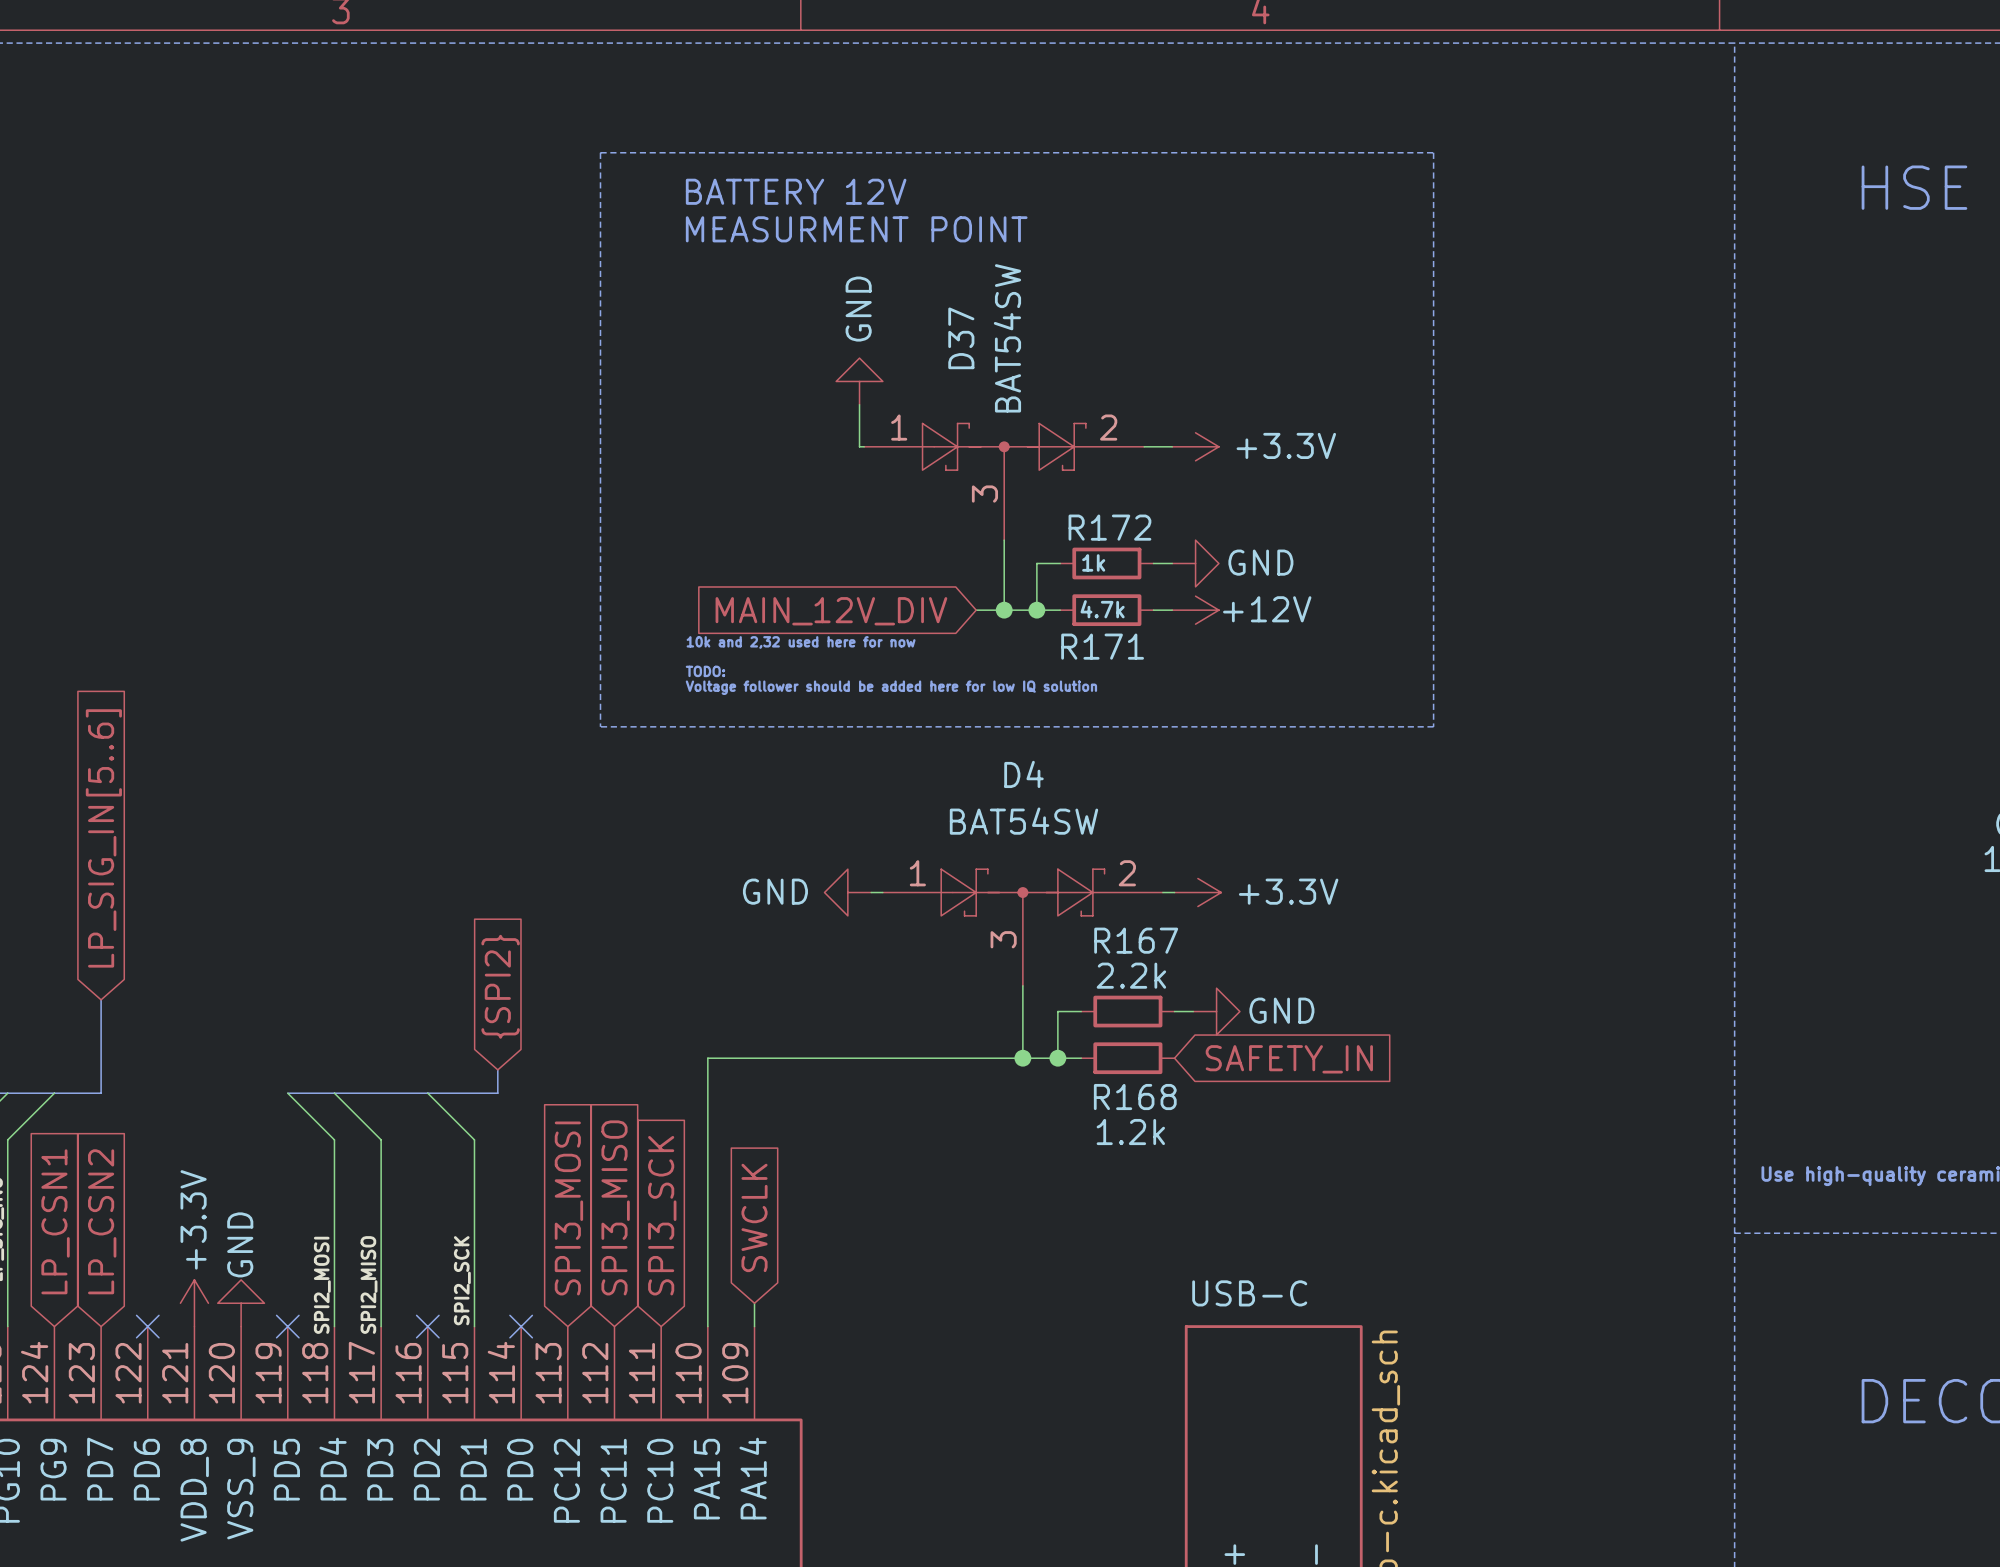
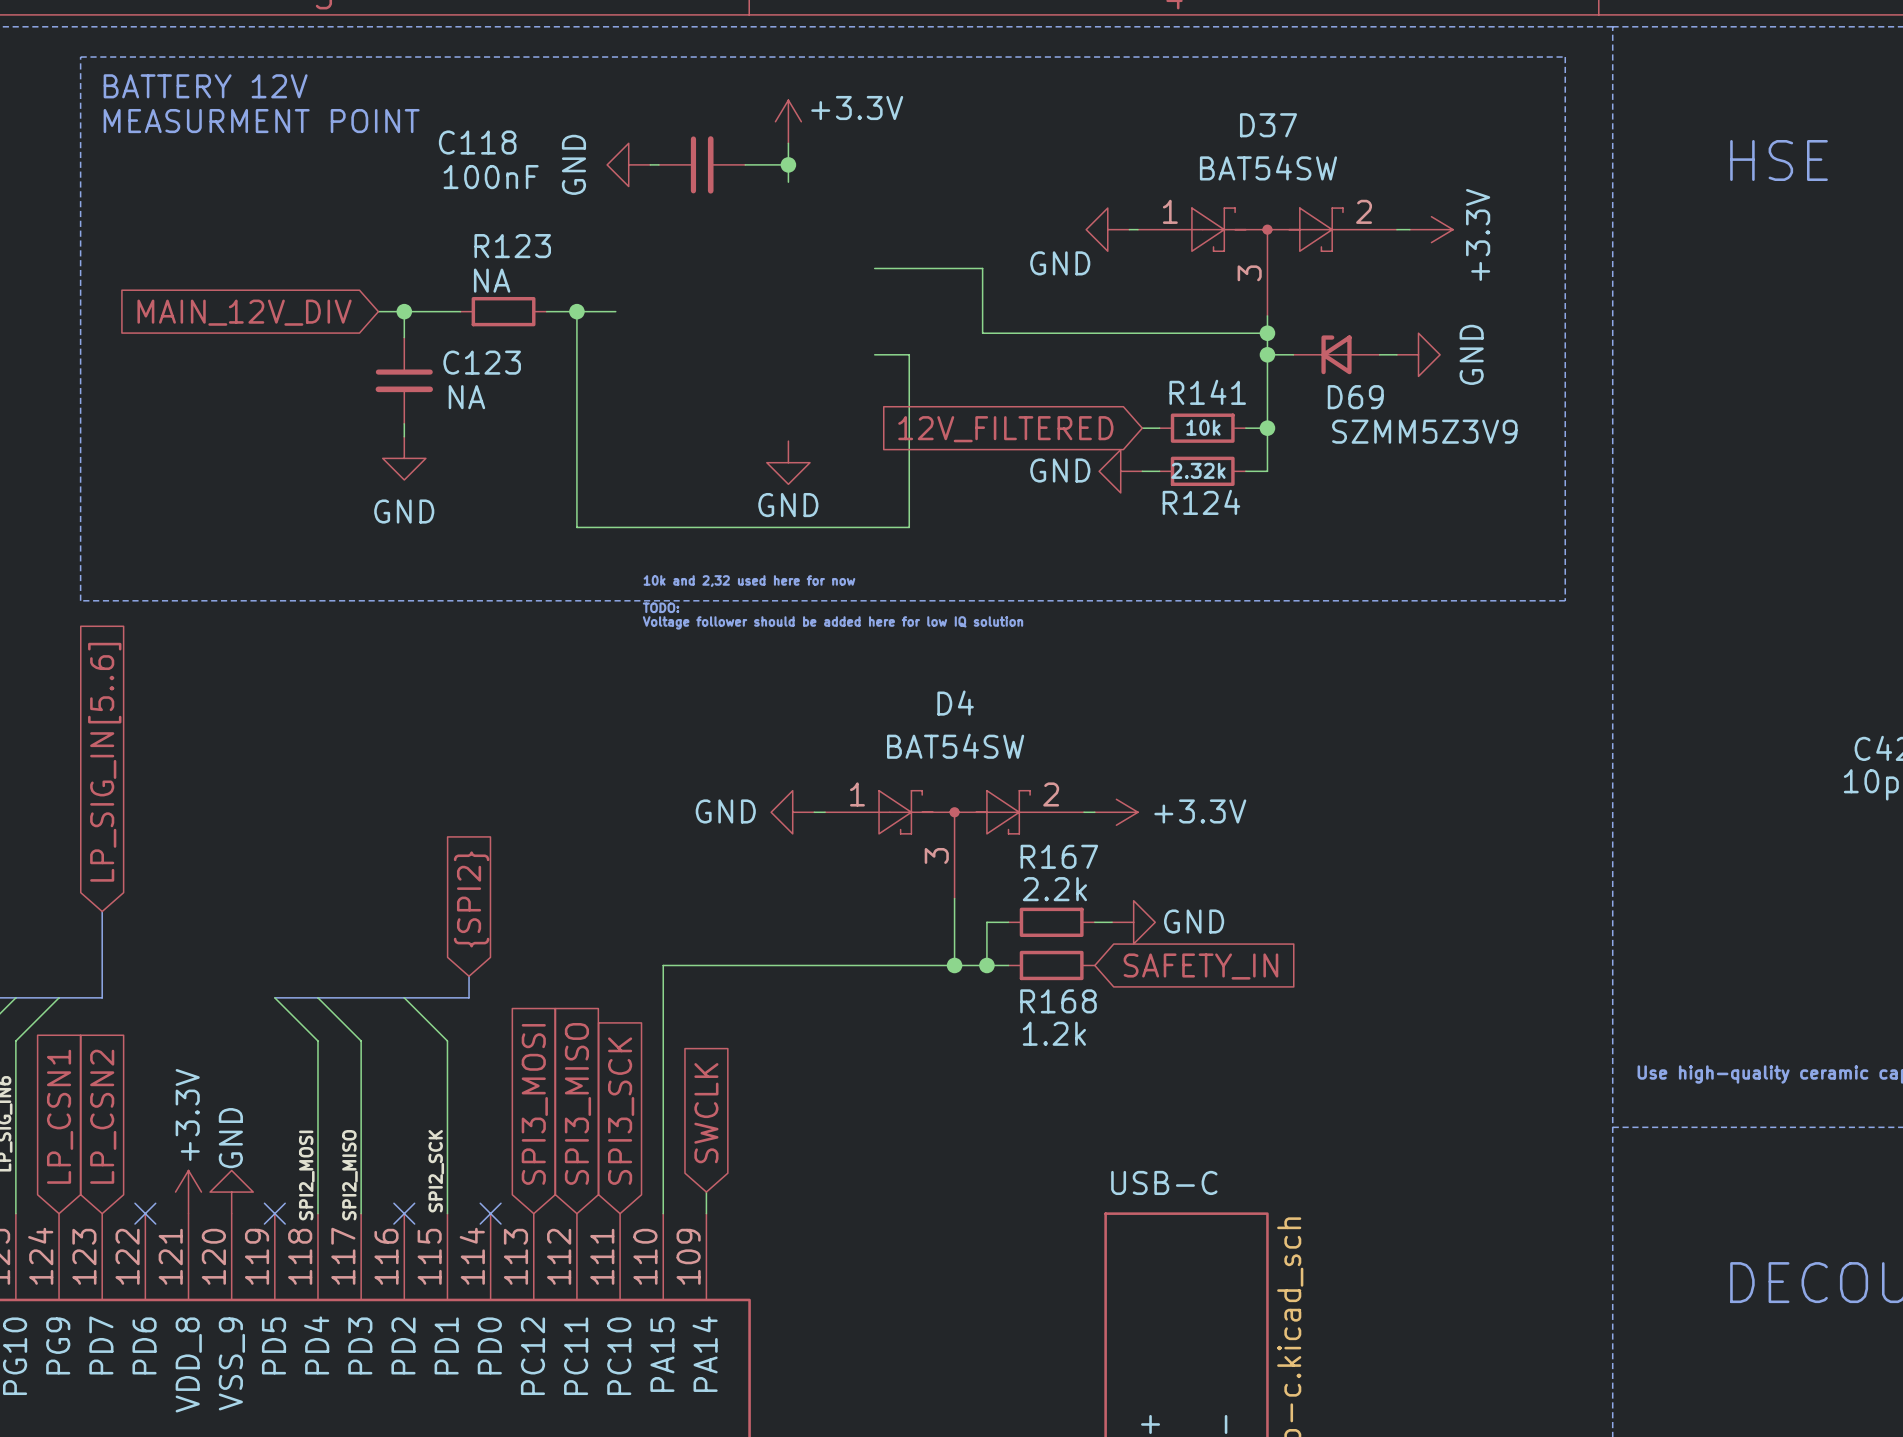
line: none -> (80, 57) (1565, 57) (1565, 600) (80, 600) (80, 57)
text: none -> BATTERY 12V (205, 86)
text: none -> MEASURMENT POINT (261, 121)
power symbol: none -> +3.3V (788, 121)
line: (600, 152) (600, 726) (1433, 726) (1433, 152) (600, 152) -> none
wire: none -> (788, 143) (788, 182)
text: BATTERY 12V (796, 191) -> none
power symbol: none -> GND (628, 164)
C118: none -> 100nF (702, 164)
wire: none -> (745, 164) (788, 164)
junction: none -> (788, 164)
text: MEASURMENT POINT (856, 229) -> none
power symbol: none -> GND (1107, 229)
wire: none -> (1129, 229) (1137, 229)
wire: none -> (1396, 229) (1409, 229)
power symbol: none -> +3.3V (1431, 229)
wire: none -> (874, 268) (982, 268) (982, 333) (1267, 333)
D37 name rotation: 0° (961, 338) -> 90° clockwise (1268, 125)
D37 value rotation: 0° (1007, 338) -> 90° clockwise (1268, 167)
wire: none -> (378, 311) (460, 311)
wire: none -> (404, 311) (404, 337)
junction: none -> (404, 311)
R123: none -> NA (503, 311)
wire: none -> (546, 311) (615, 311)
wire: none -> (576, 311) (576, 527) (909, 527) (909, 354) (874, 354)
junction: none -> (576, 311)
global label: none -> MAIN_12V_DIV (244, 312)
wire: none -> (1267, 315) (1267, 471) (1245, 471)
junction: none -> (1267, 333)
power symbol: GND (859, 381) -> none
junction: none -> (1267, 354)
D69: none -> SZMM5Z3V9 (1336, 354)
wire: none -> (1379, 354) (1396, 354)
power symbol: none -> GND (1418, 354)
wire: (859, 404) (859, 446) (864, 446) -> none
C123: none -> NA (404, 380)
wire: (1144, 446) (1172, 446) -> (1267, 354) (1293, 354)
power symbol: +3.3V (1195, 446) -> none
wire: none -> (404, 423) (404, 436)
R141: none -> 10k (1202, 428)
wire: none -> (1245, 428) (1267, 428)
junction: none -> (1267, 428)
global label: none -> 12V_FILTERED (1005, 429)
D37 position: (1004, 481) -> (1267, 262)
power symbol: none -> GND (404, 458)
power symbol: none -> GND (788, 462)
R124: none -> 2.32k (1202, 471)
wire: (1004, 540) (1004, 610) -> none
wire: (1060, 563) (1036, 563) (1036, 610) -> none
R172: 1k (1106, 563) -> none
wire: (1153, 563) (1172, 563) -> (1142, 428) (1159, 428)
power symbol rotation: 0° (1195, 563) -> 180° (1120, 471)
power symbol position: GND (1195, 563) -> GND (1120, 471)
wire: (976, 610) (1060, 610) -> none
junction: (1004, 610) -> none
junction: (1036, 610) -> none
R171: 4.7k (1106, 610) -> none
wire: (1153, 610) (1172, 610) -> (1142, 471) (1159, 471)
power symbol: +12V (1195, 610) -> none
global label: MAIN_12V_DIV (831, 611) -> none

